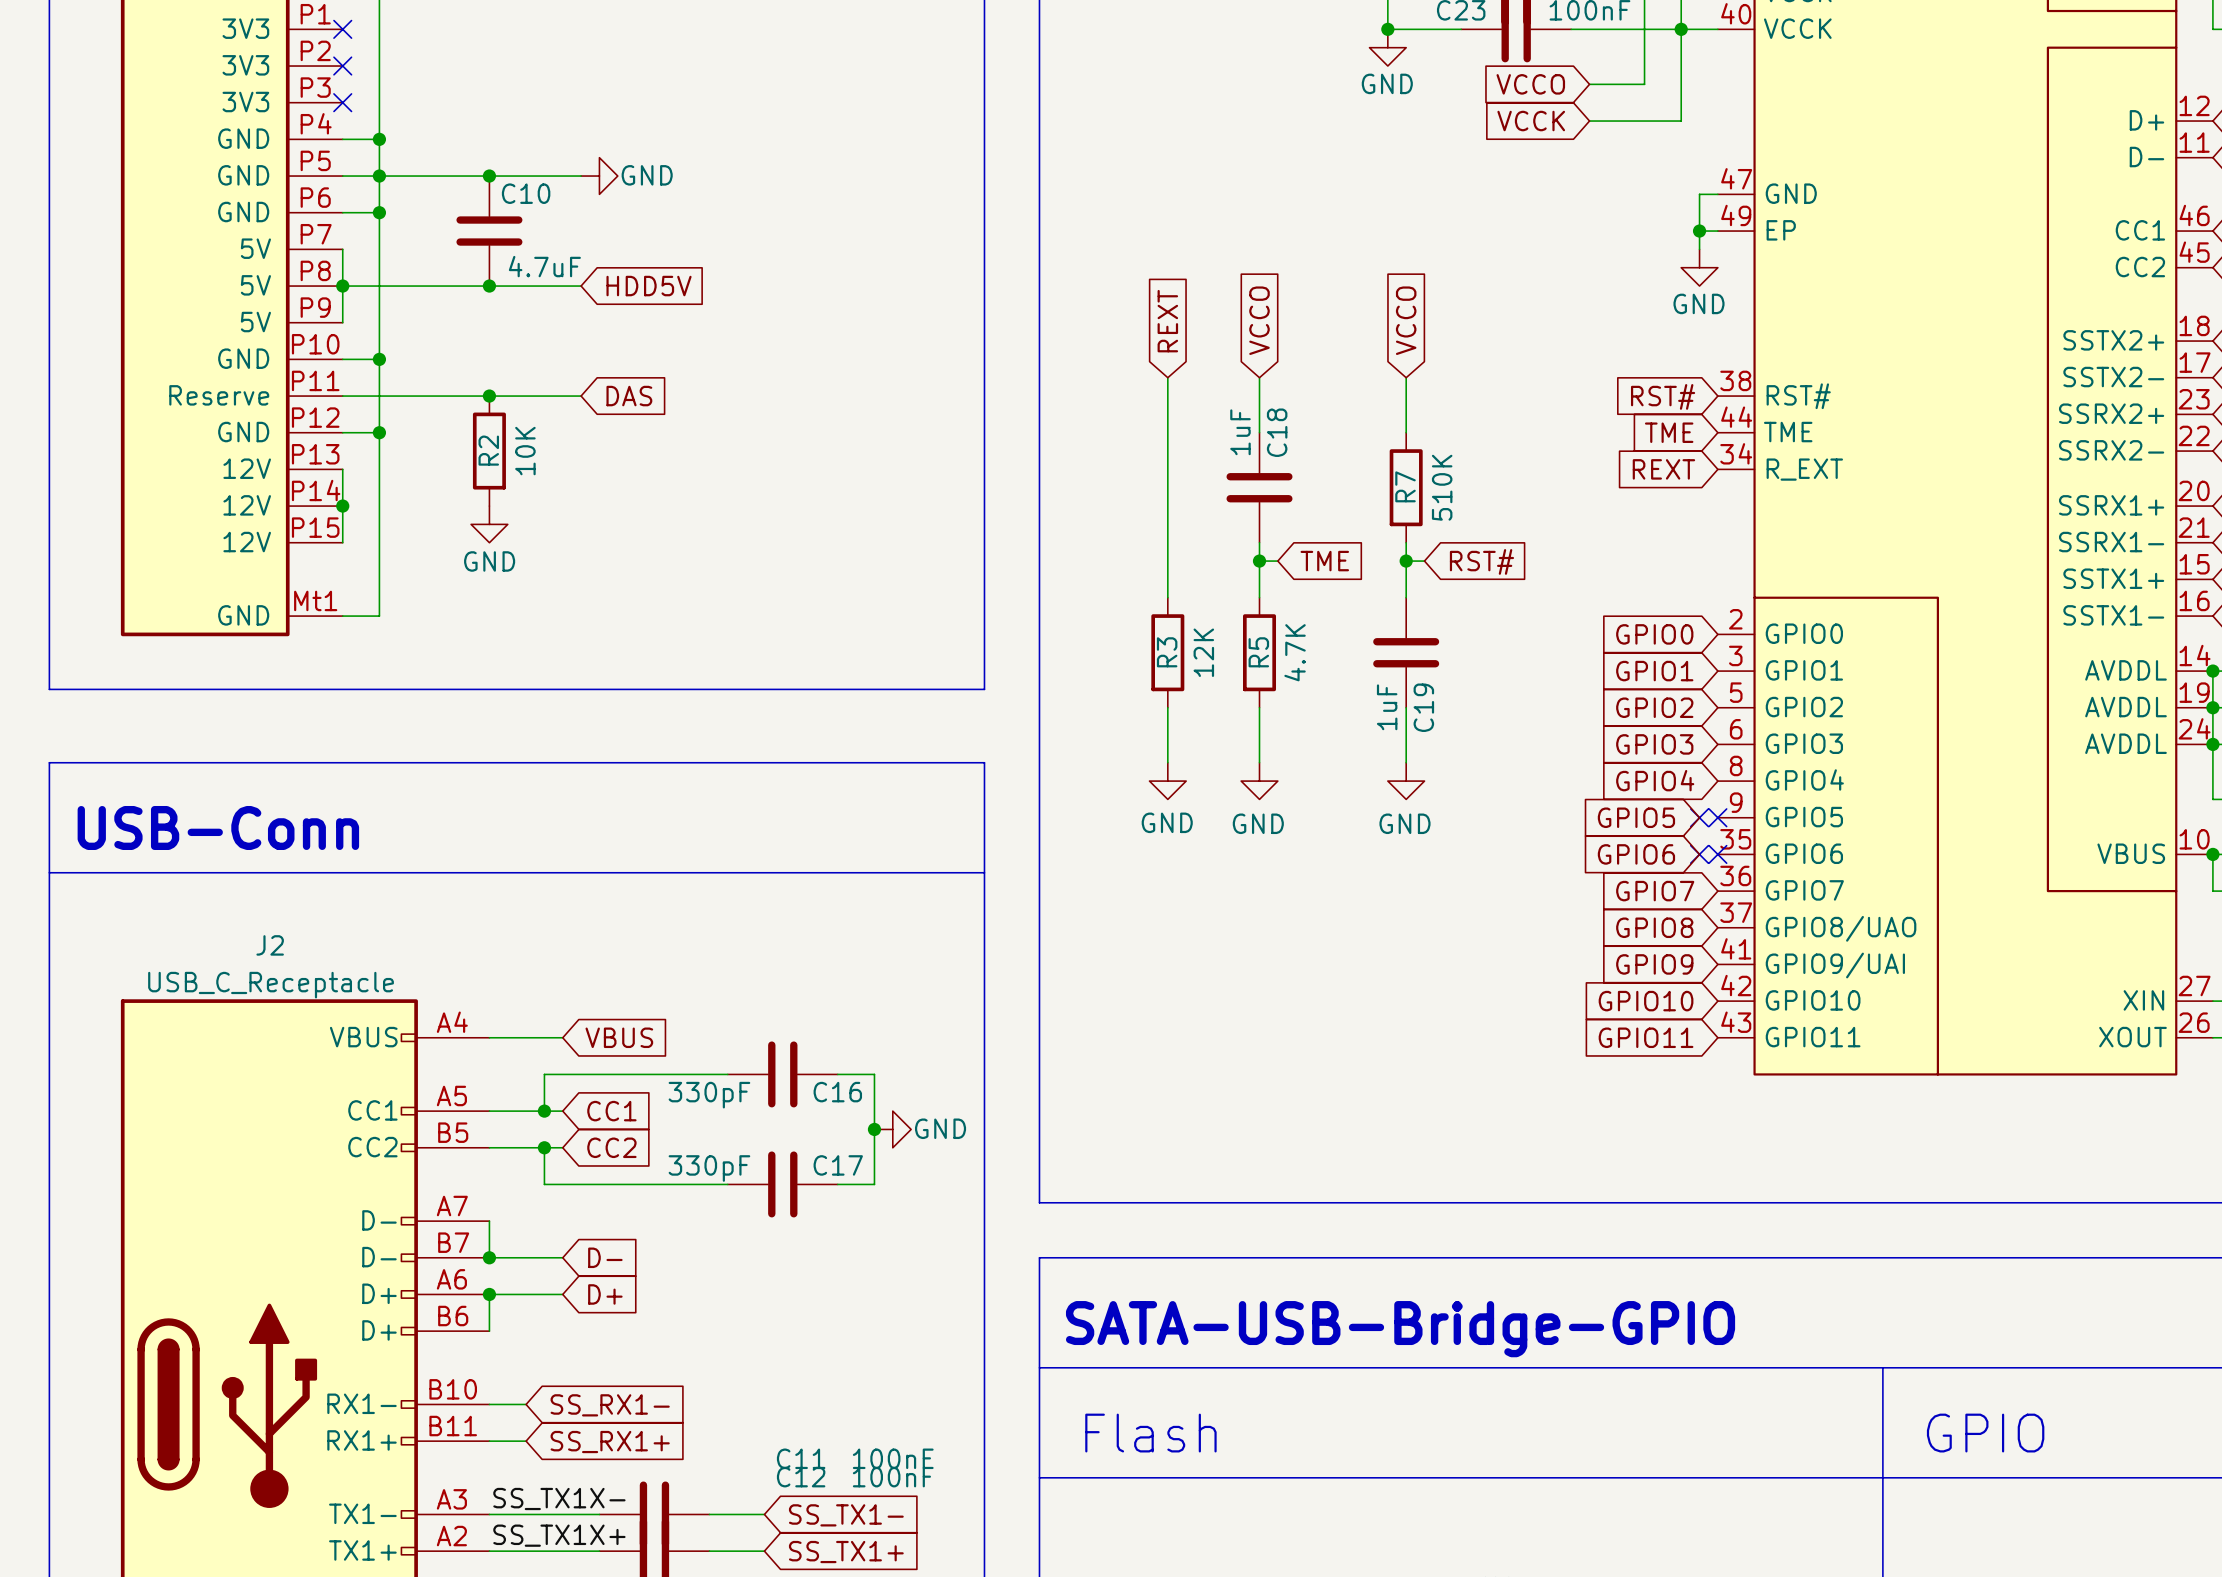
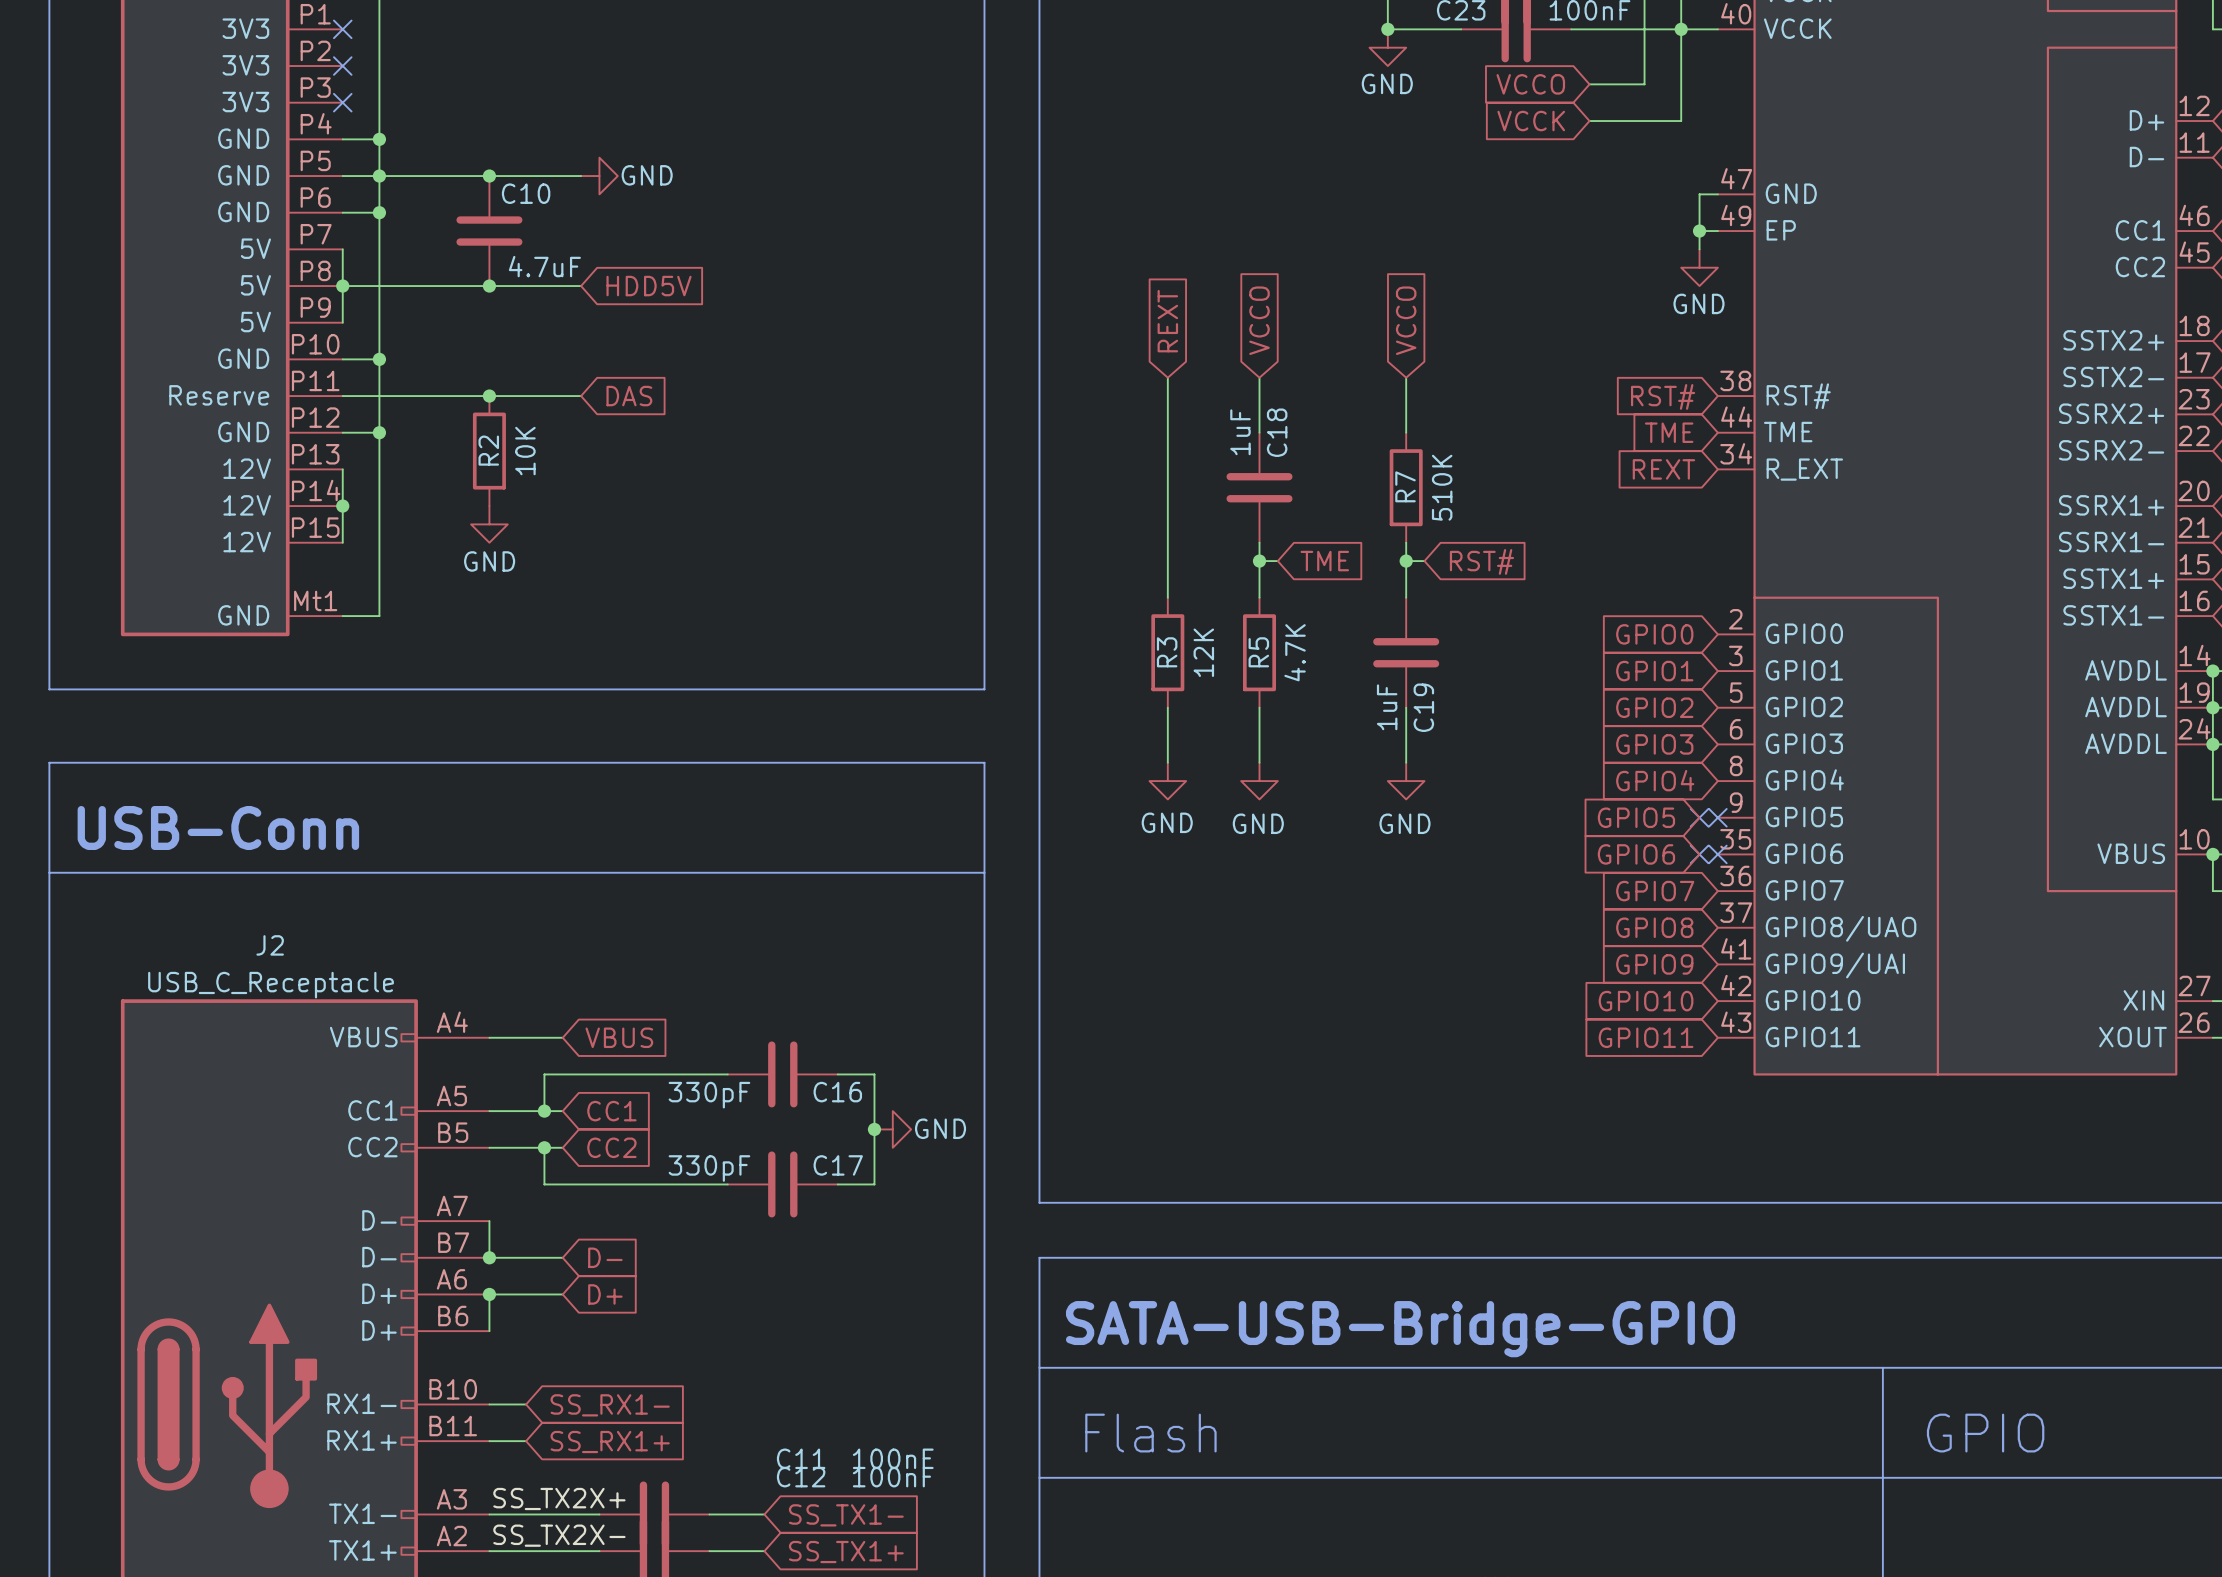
label: SS_TX1X- (559, 1498) -> SS_TX2X+ (559, 1498)
label: SS_TX1X+ (559, 1535) -> SS_TX2X- (559, 1535)

